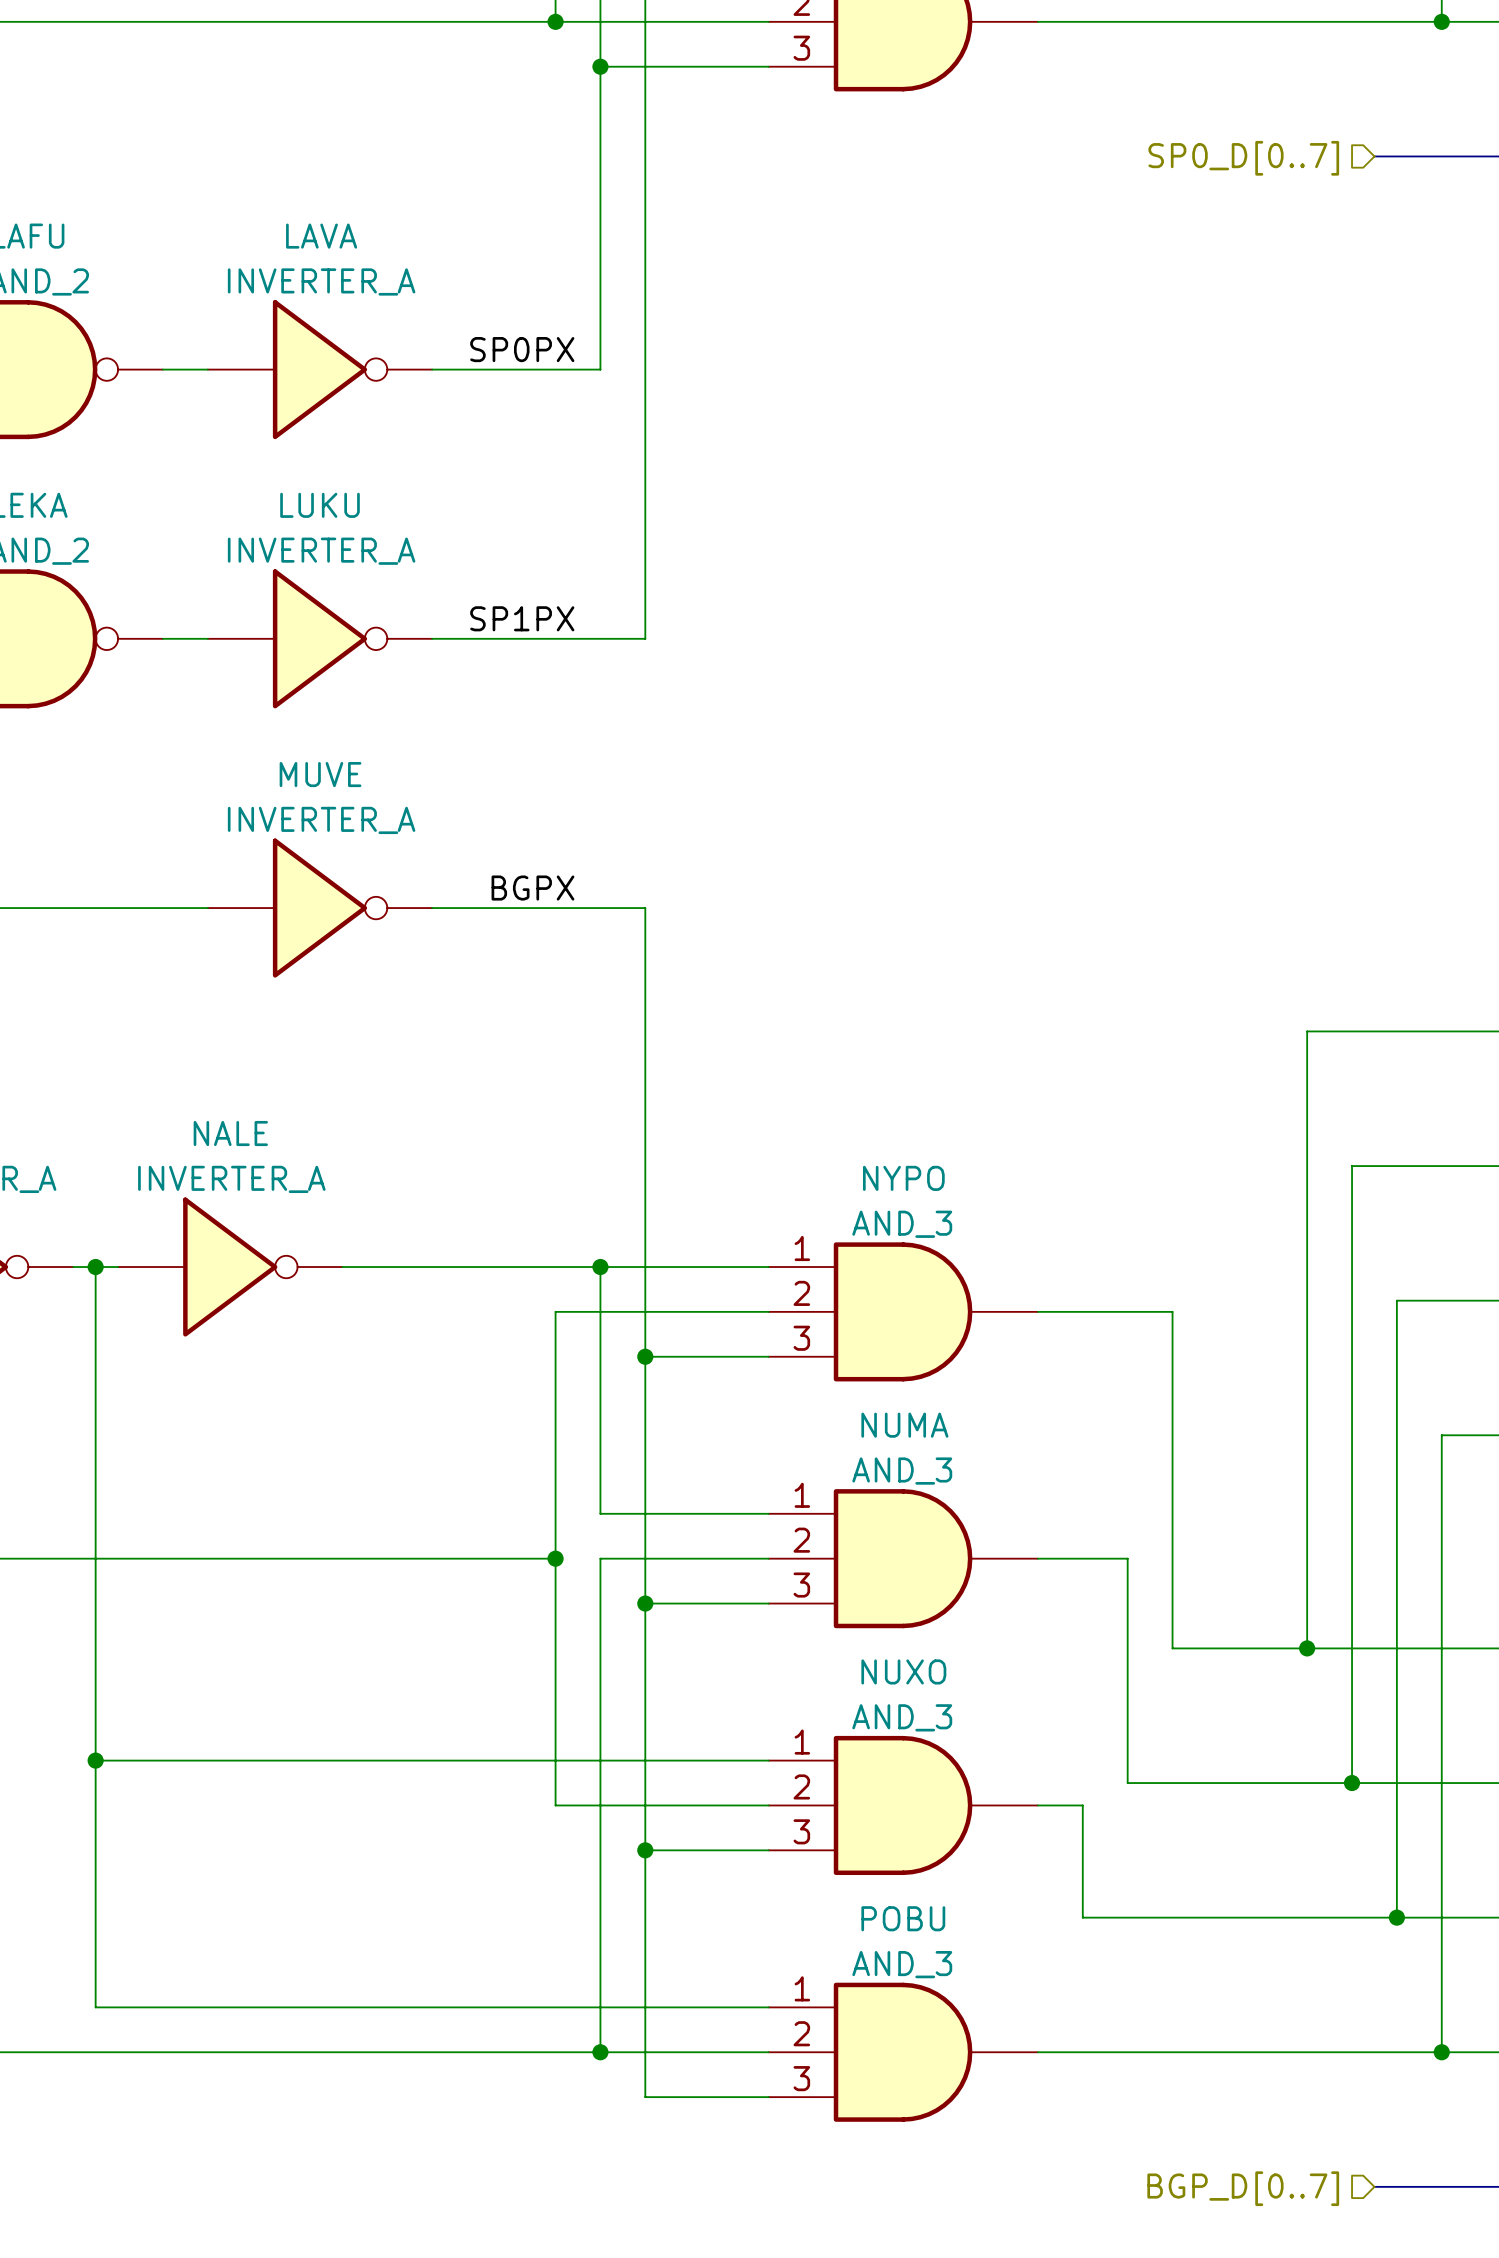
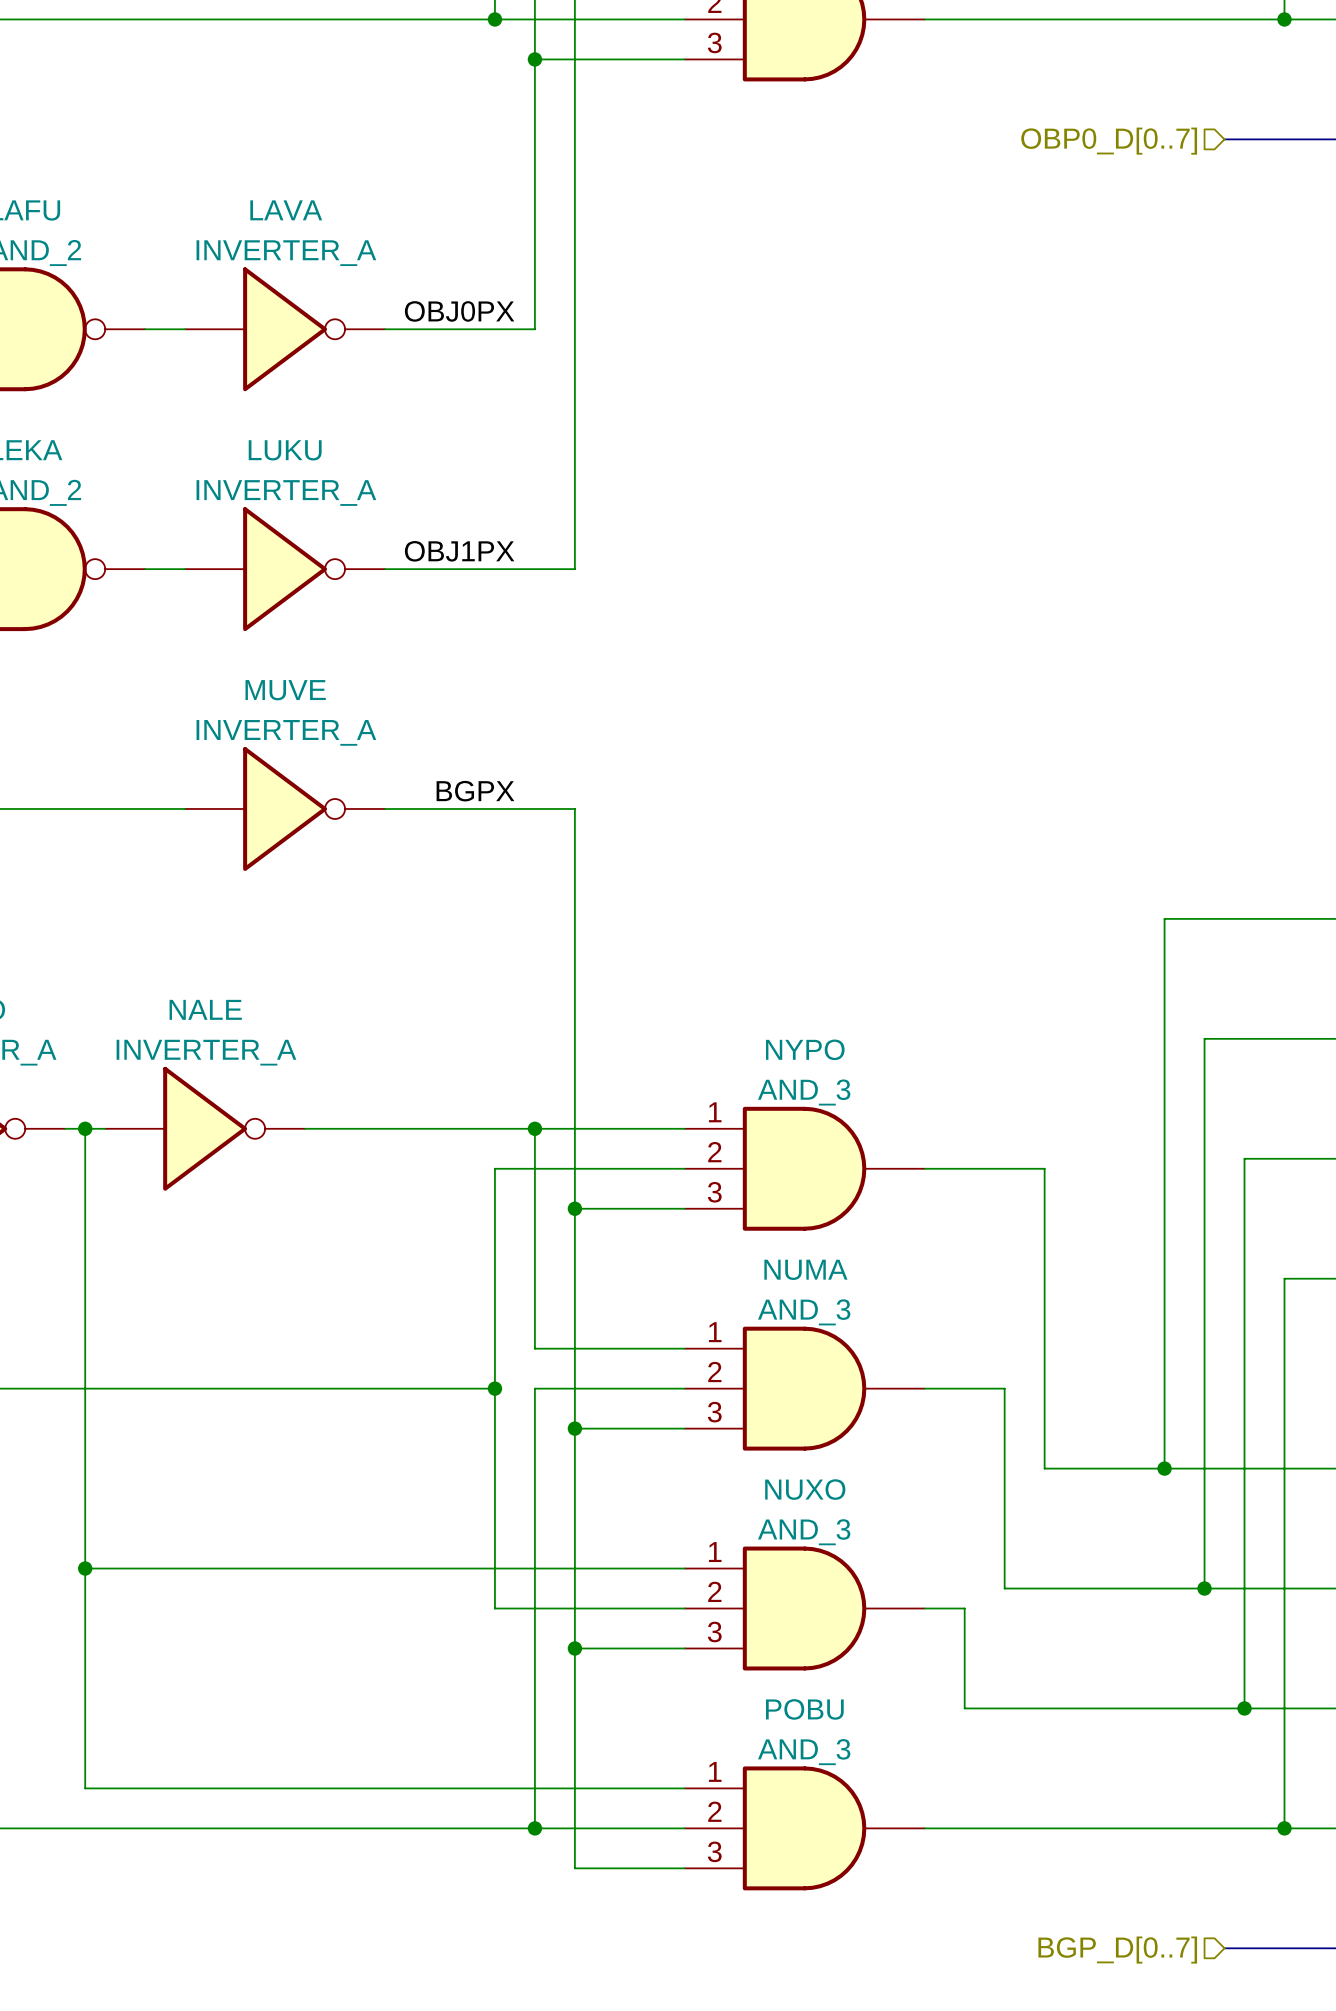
hierarchical label: SP0_D[0..7] (1243, 158) -> OBP0_D[0..7] (1109, 141)
label: SP0PX (522, 349) -> OBJ0PX (459, 311)
label: SP1PX (522, 618) -> OBJ1PX (459, 551)

